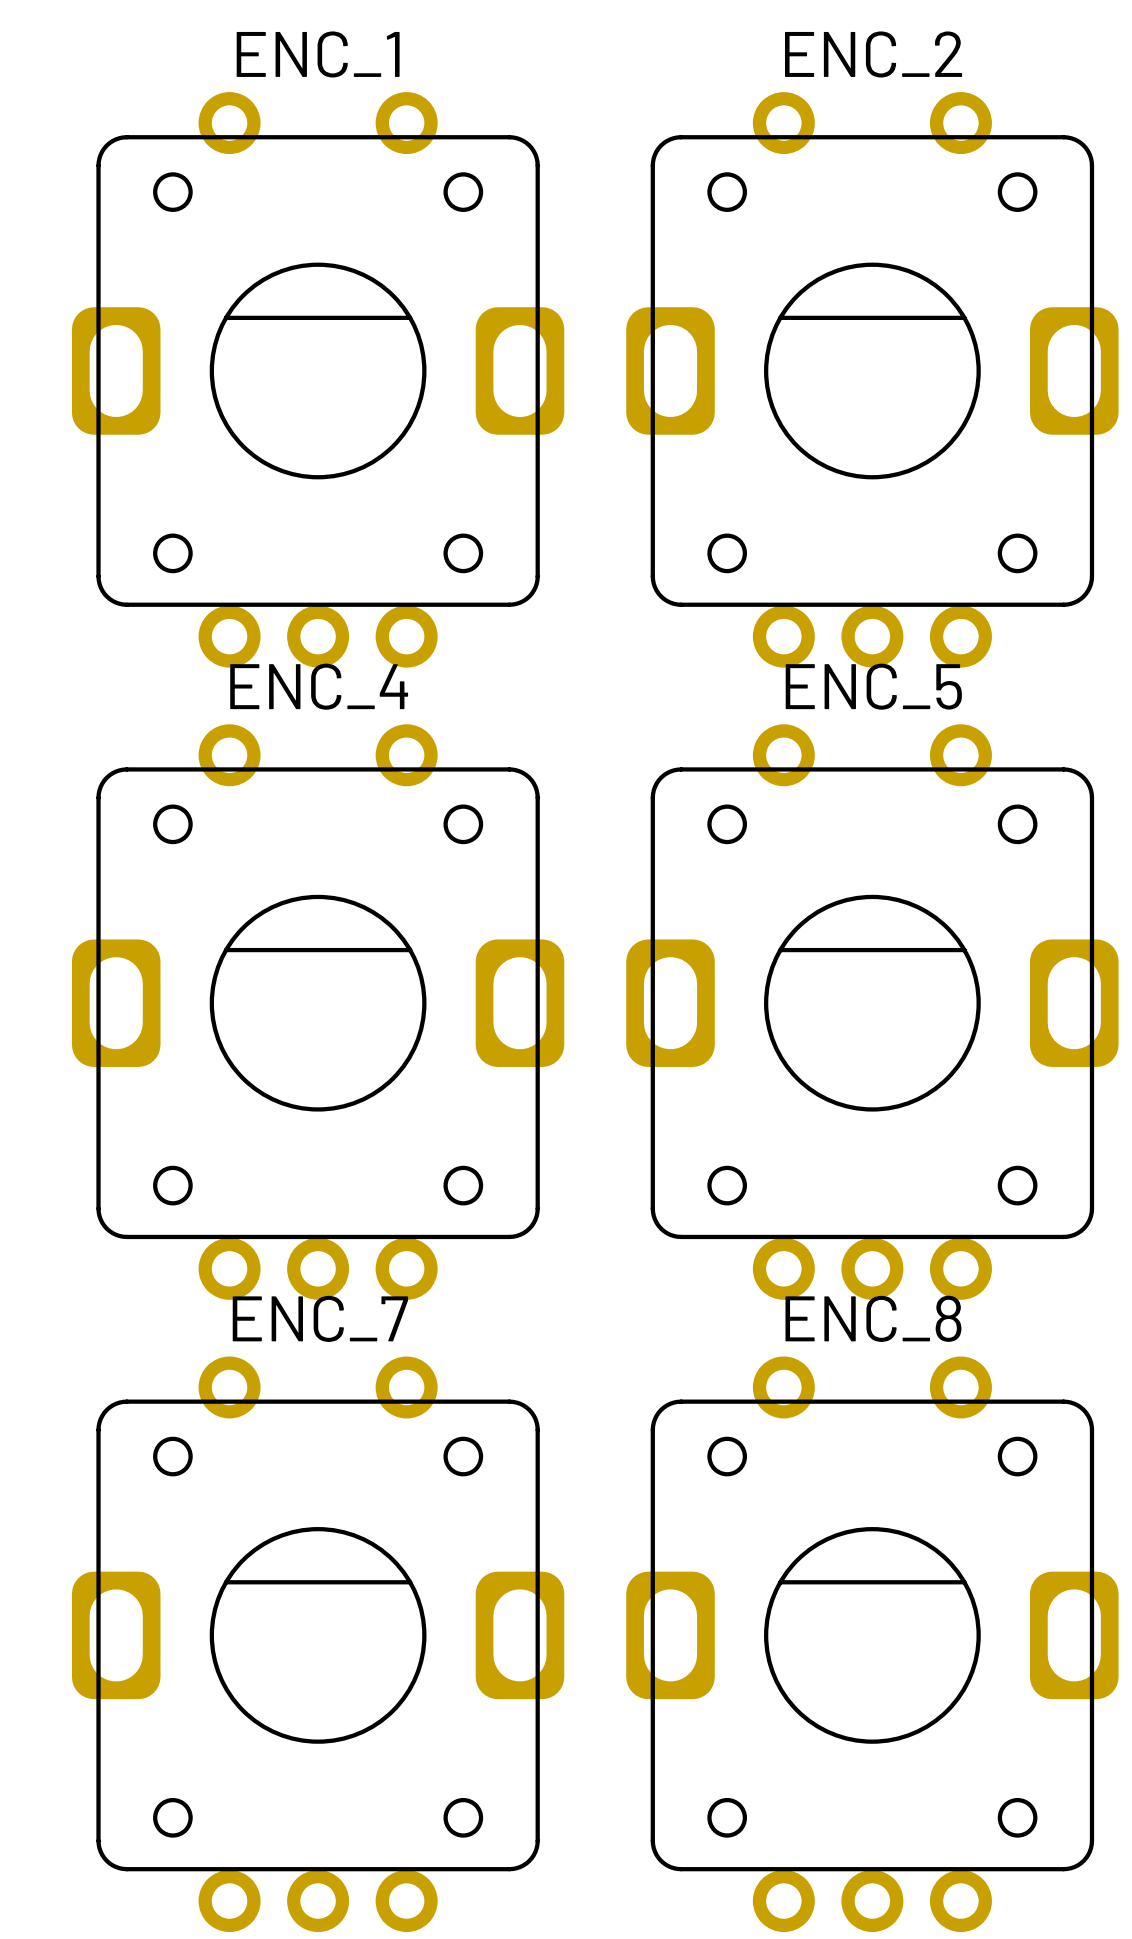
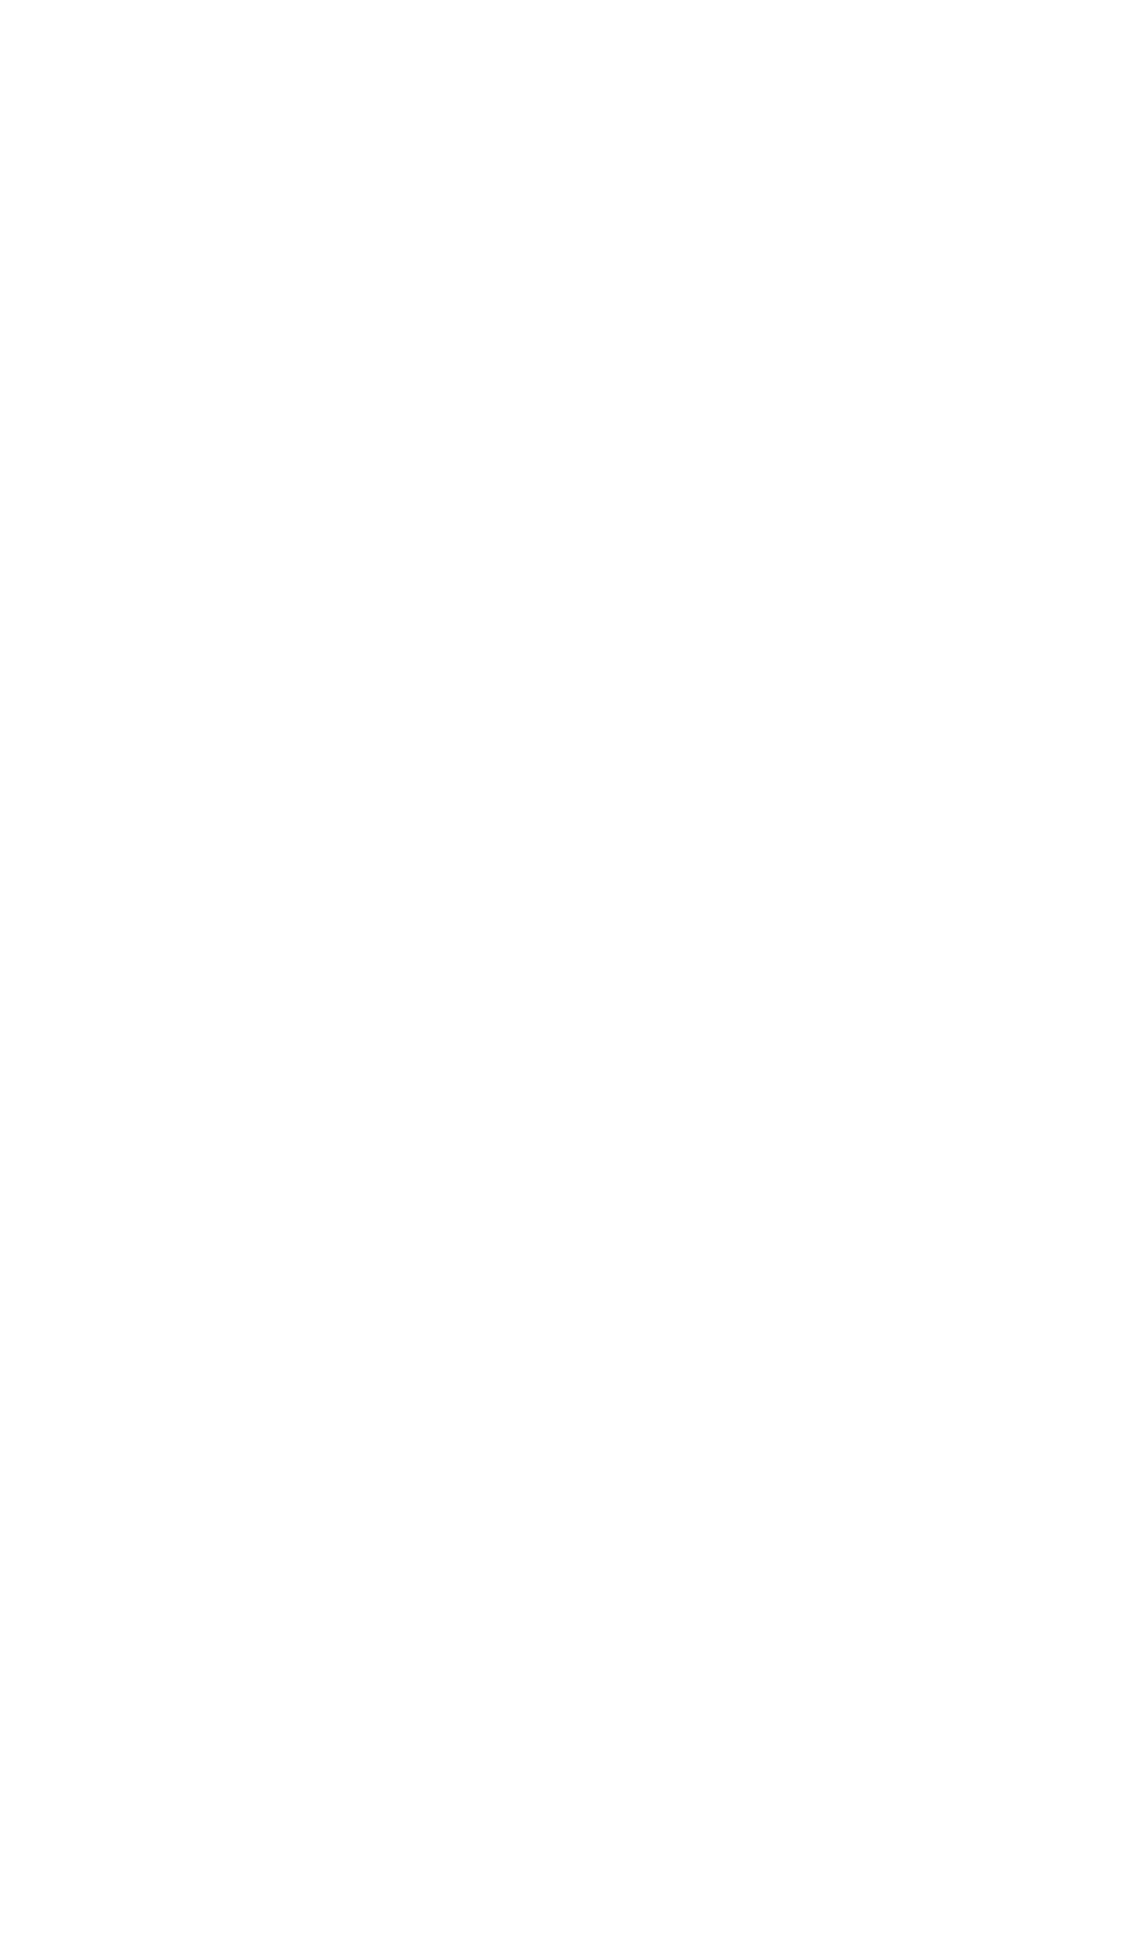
ENC_1: (318, 379) -> none
ENC_2: (872, 379) -> none
ENC_4: (318, 1012) -> none
ENC_5: (872, 1012) -> none
ENC_7: (318, 1644) -> none
ENC_8: (872, 1644) -> none

